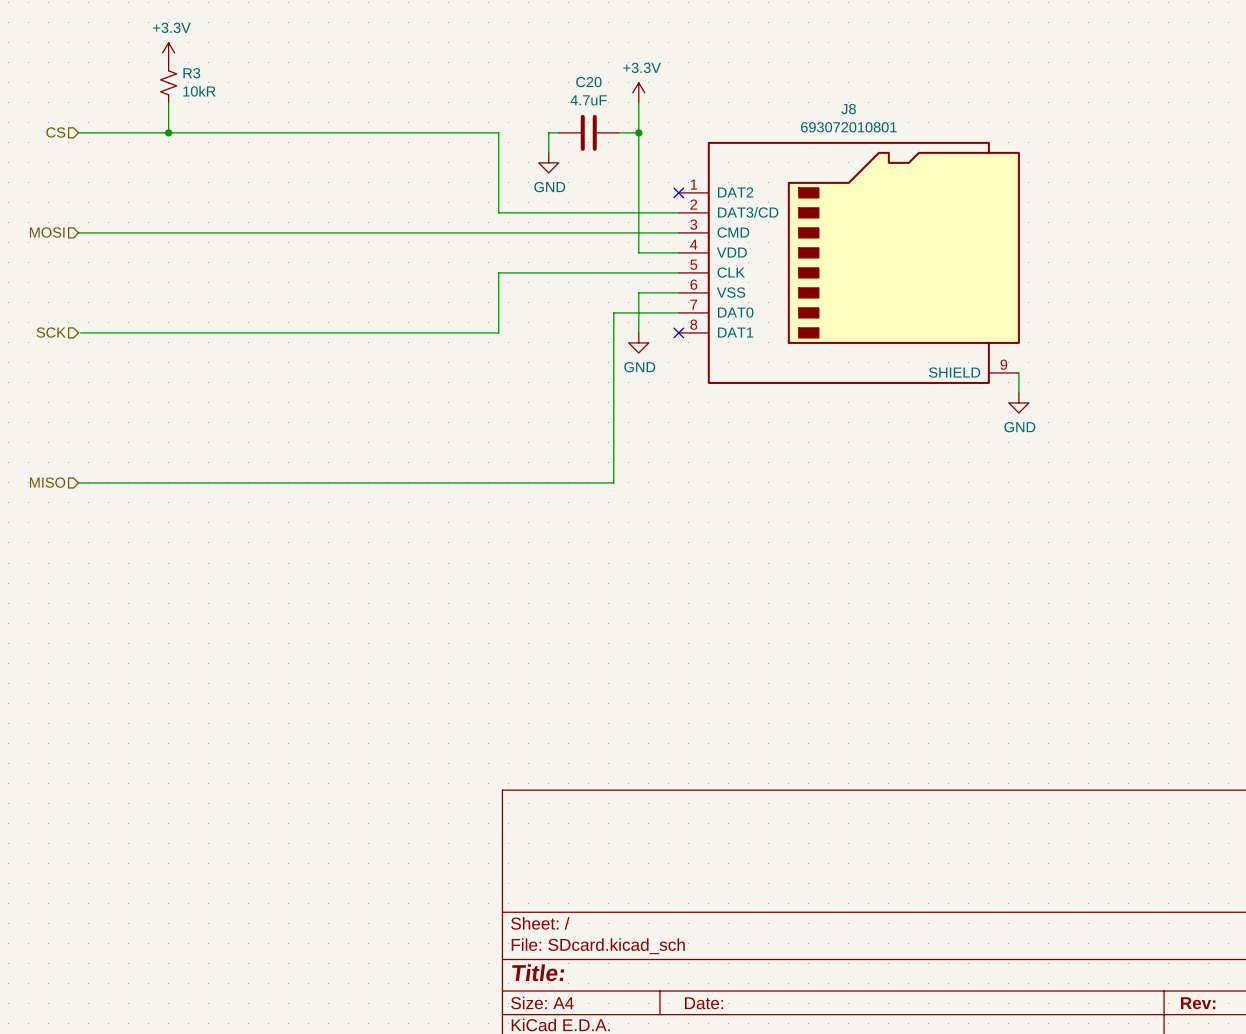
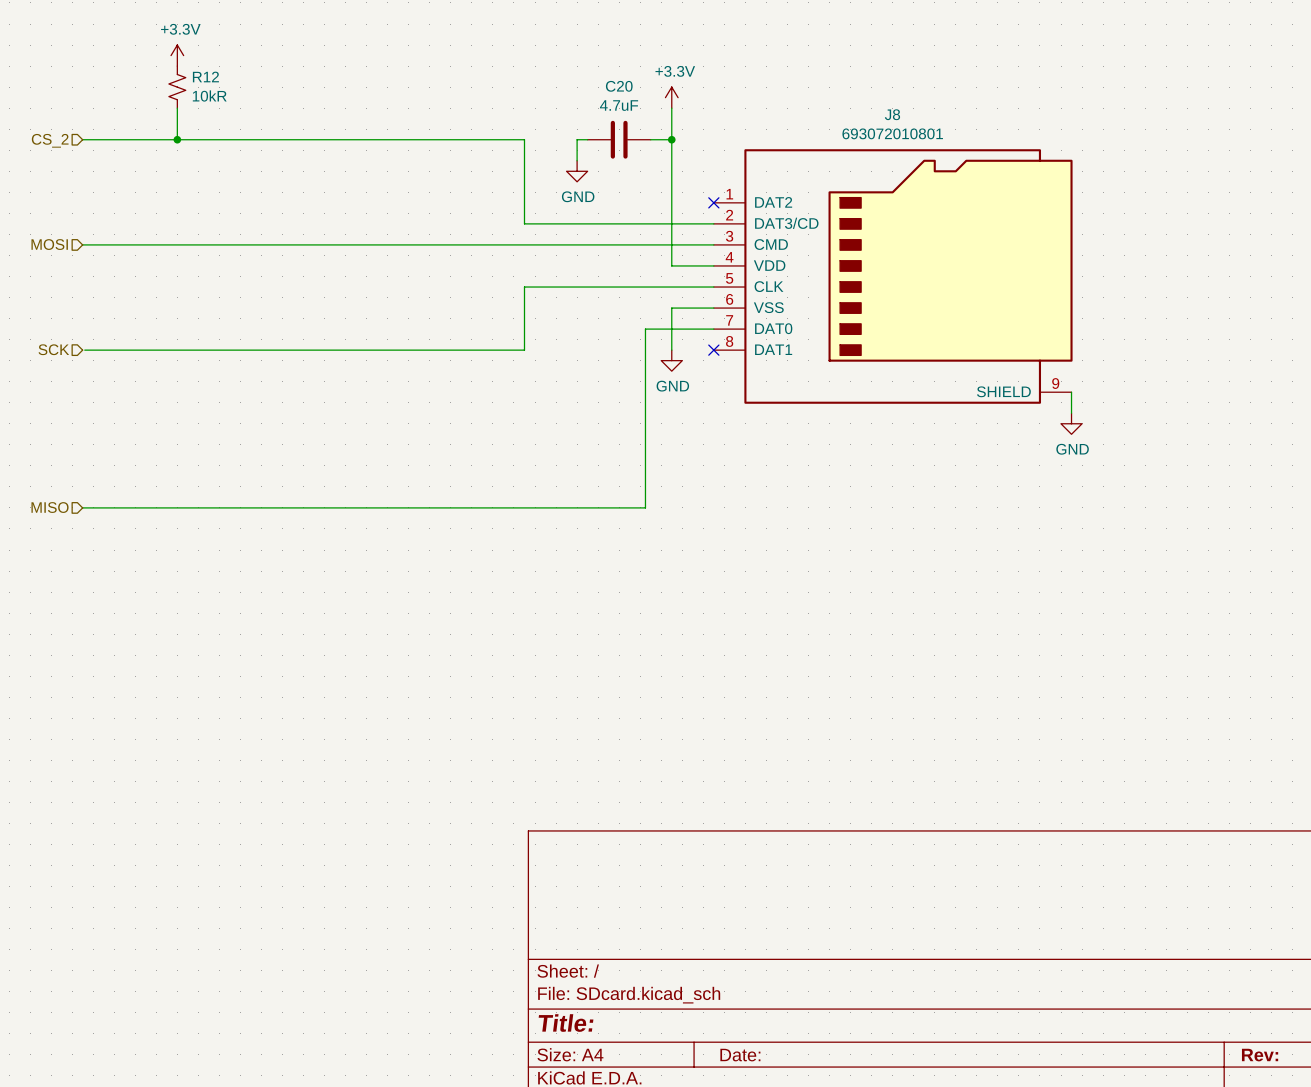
R3 name: R3 (191, 73) -> R12 (205, 76)
hierarchical label: CS (55, 132) -> CS_2 (50, 140)

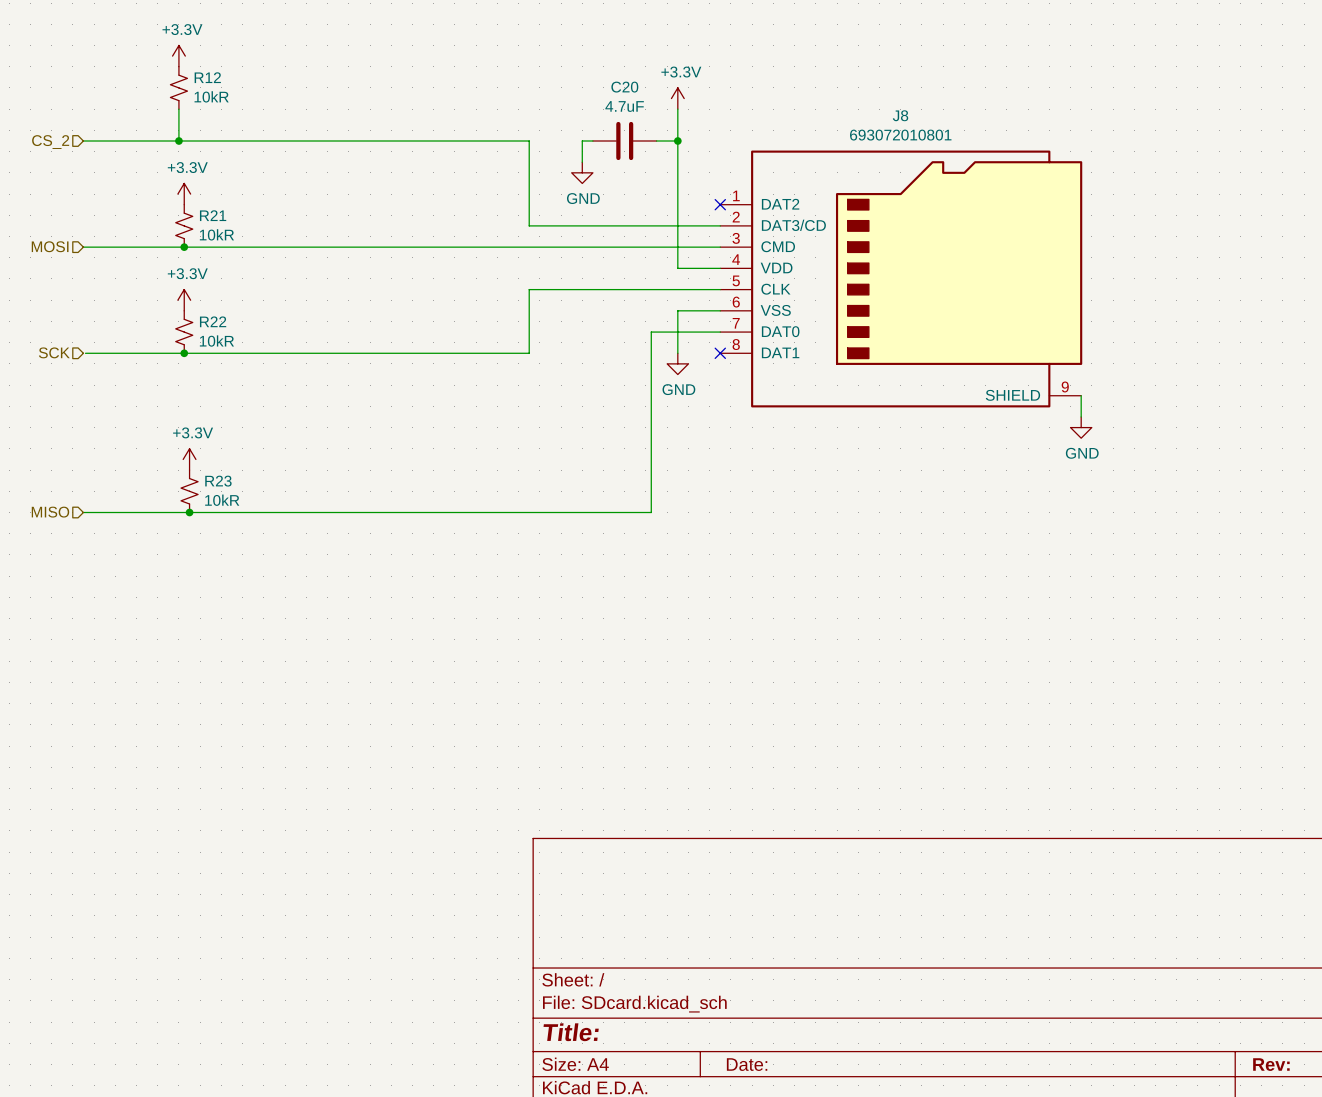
power symbol: none -> +3.3V (184, 194)
R21: none -> 10kR (184, 225)
junction: none -> (184, 247)
power symbol: none -> +3.3V (184, 300)
R22: none -> 10kR (184, 332)
junction: none -> (184, 353)
power symbol: none -> +3.3V (189, 459)
R23: none -> 10kR (189, 491)
junction: none -> (189, 512)

